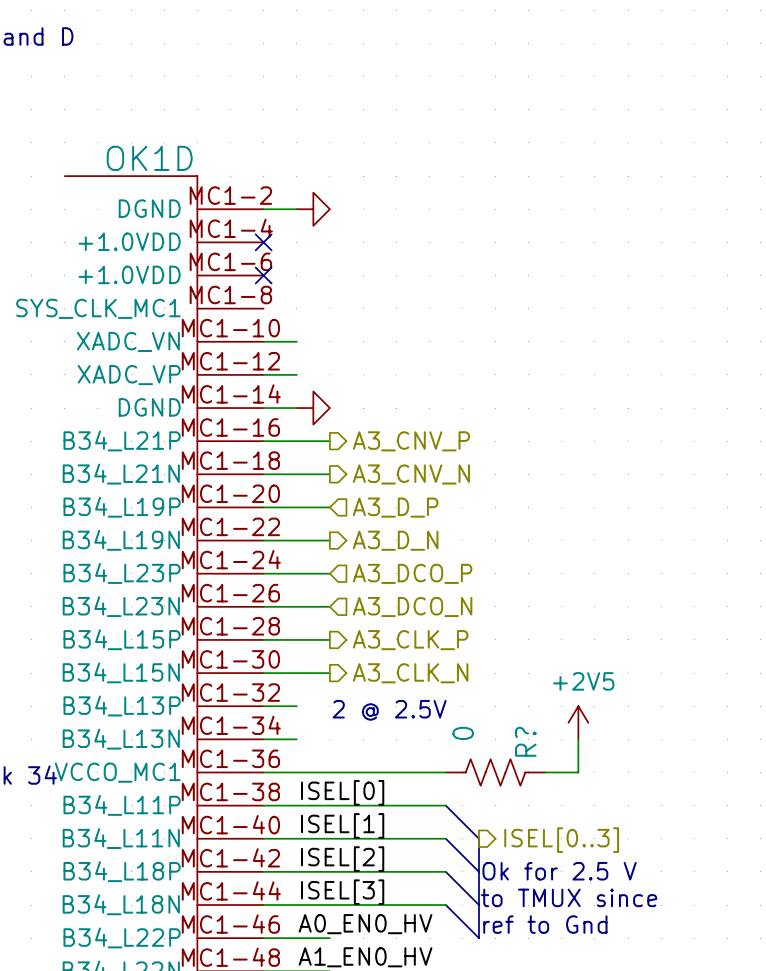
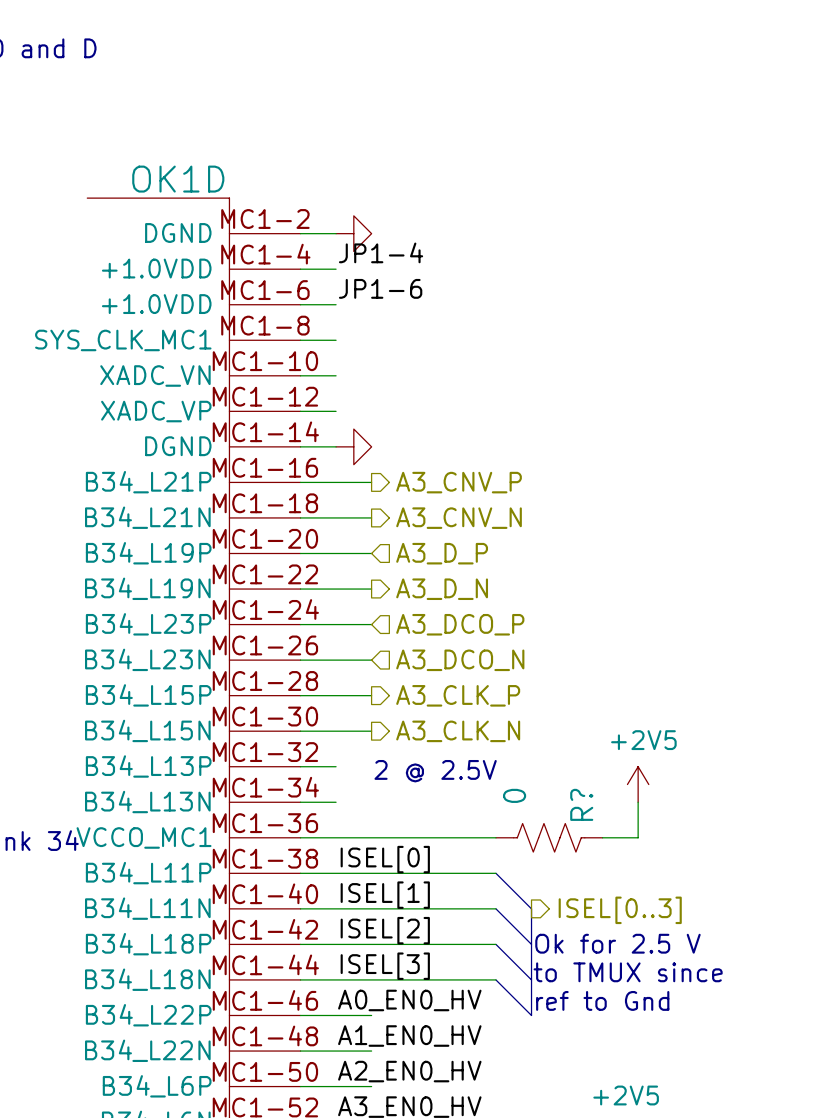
label: none -> JP1-4 (381, 252)
wire: none -> (300, 269) (336, 269)
no-connect mark: (263, 242) -> none
label: none -> JP1-6 (380, 288)
wire: none -> (300, 304) (336, 304)
no-connect mark: (263, 275) -> none
wire: none -> (300, 340) (336, 340)

